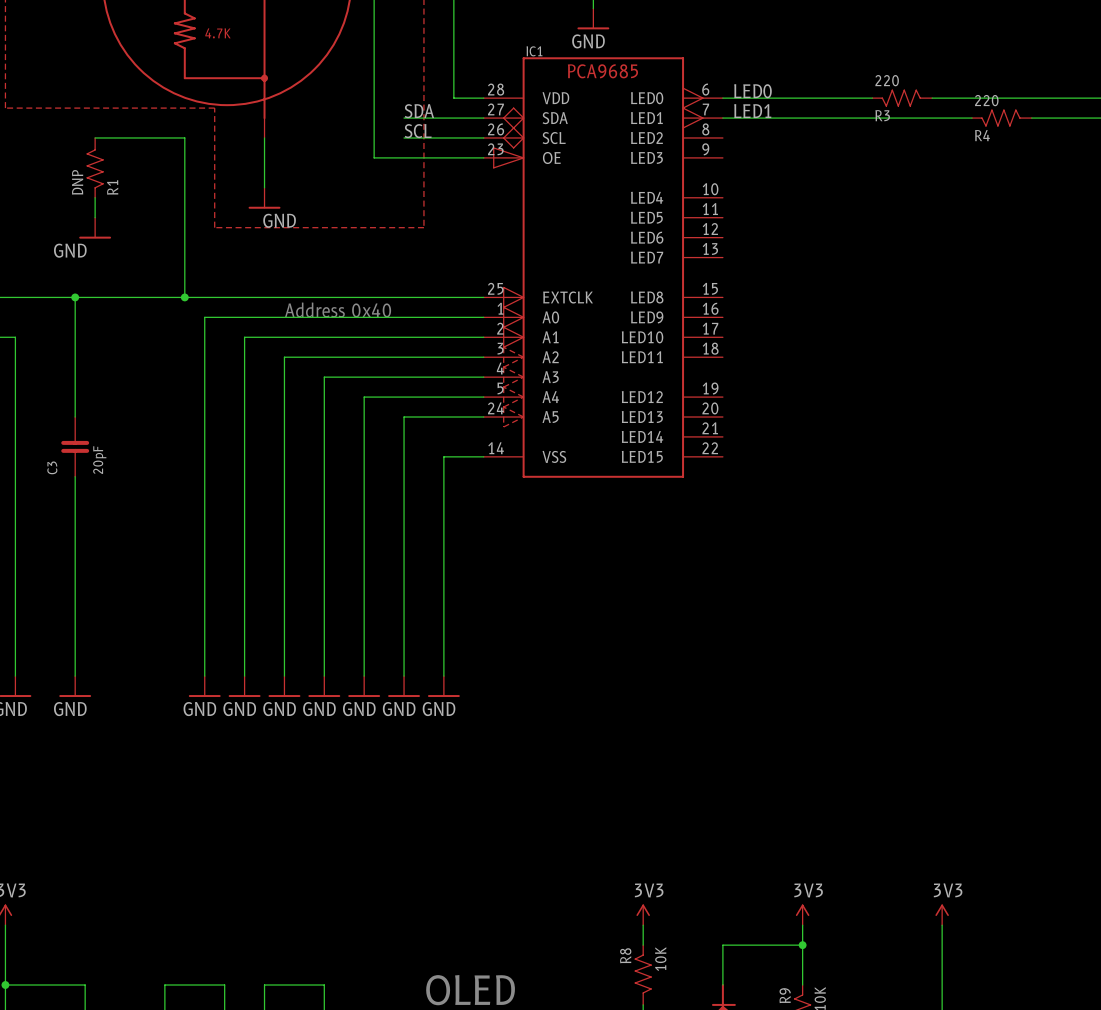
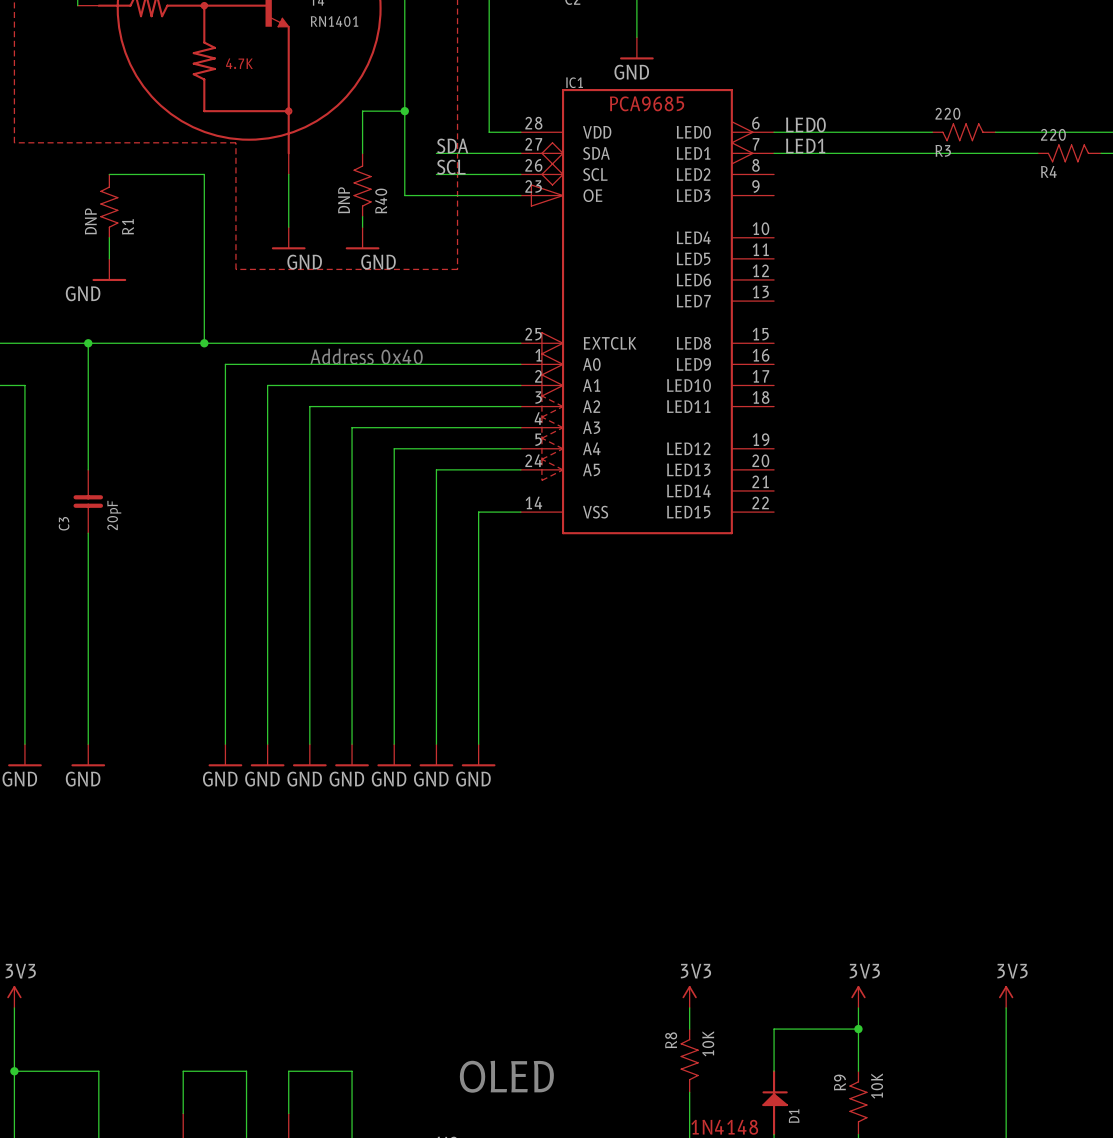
wire: none -> (404, 111) (362, 111) (362, 153)
junction: none -> (404, 111)
R40: none -> DNP (362, 185)
wire: none -> (362, 216) (362, 227)
power symbol: none -> GND (362, 238)

